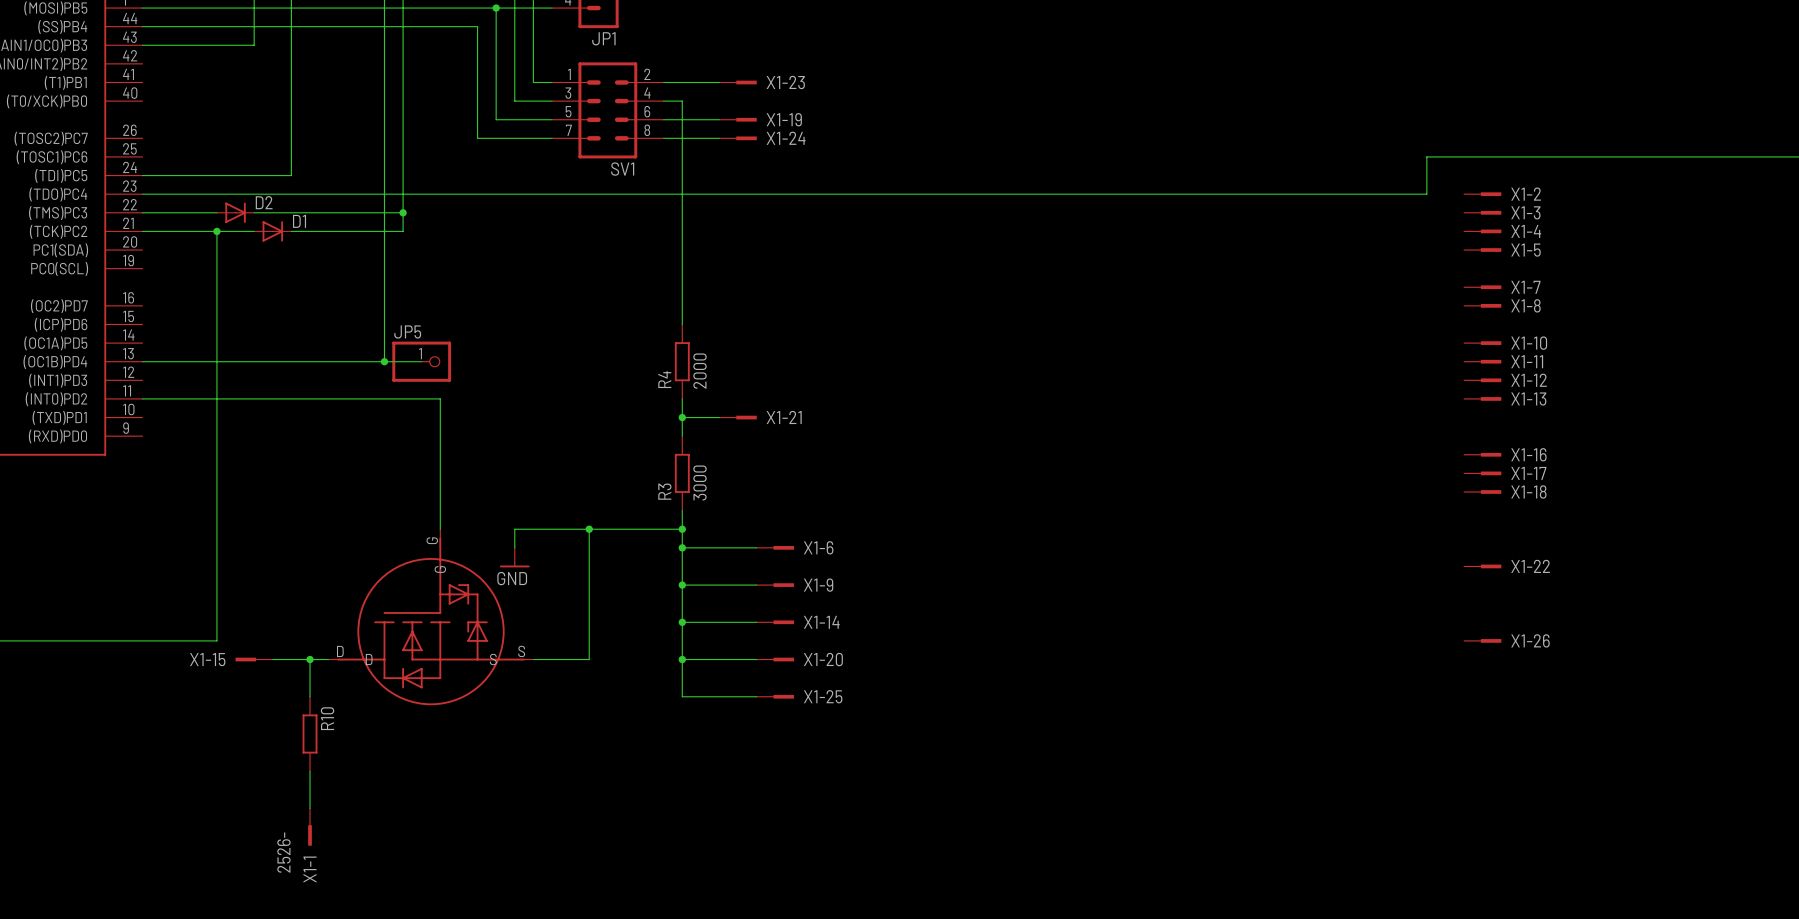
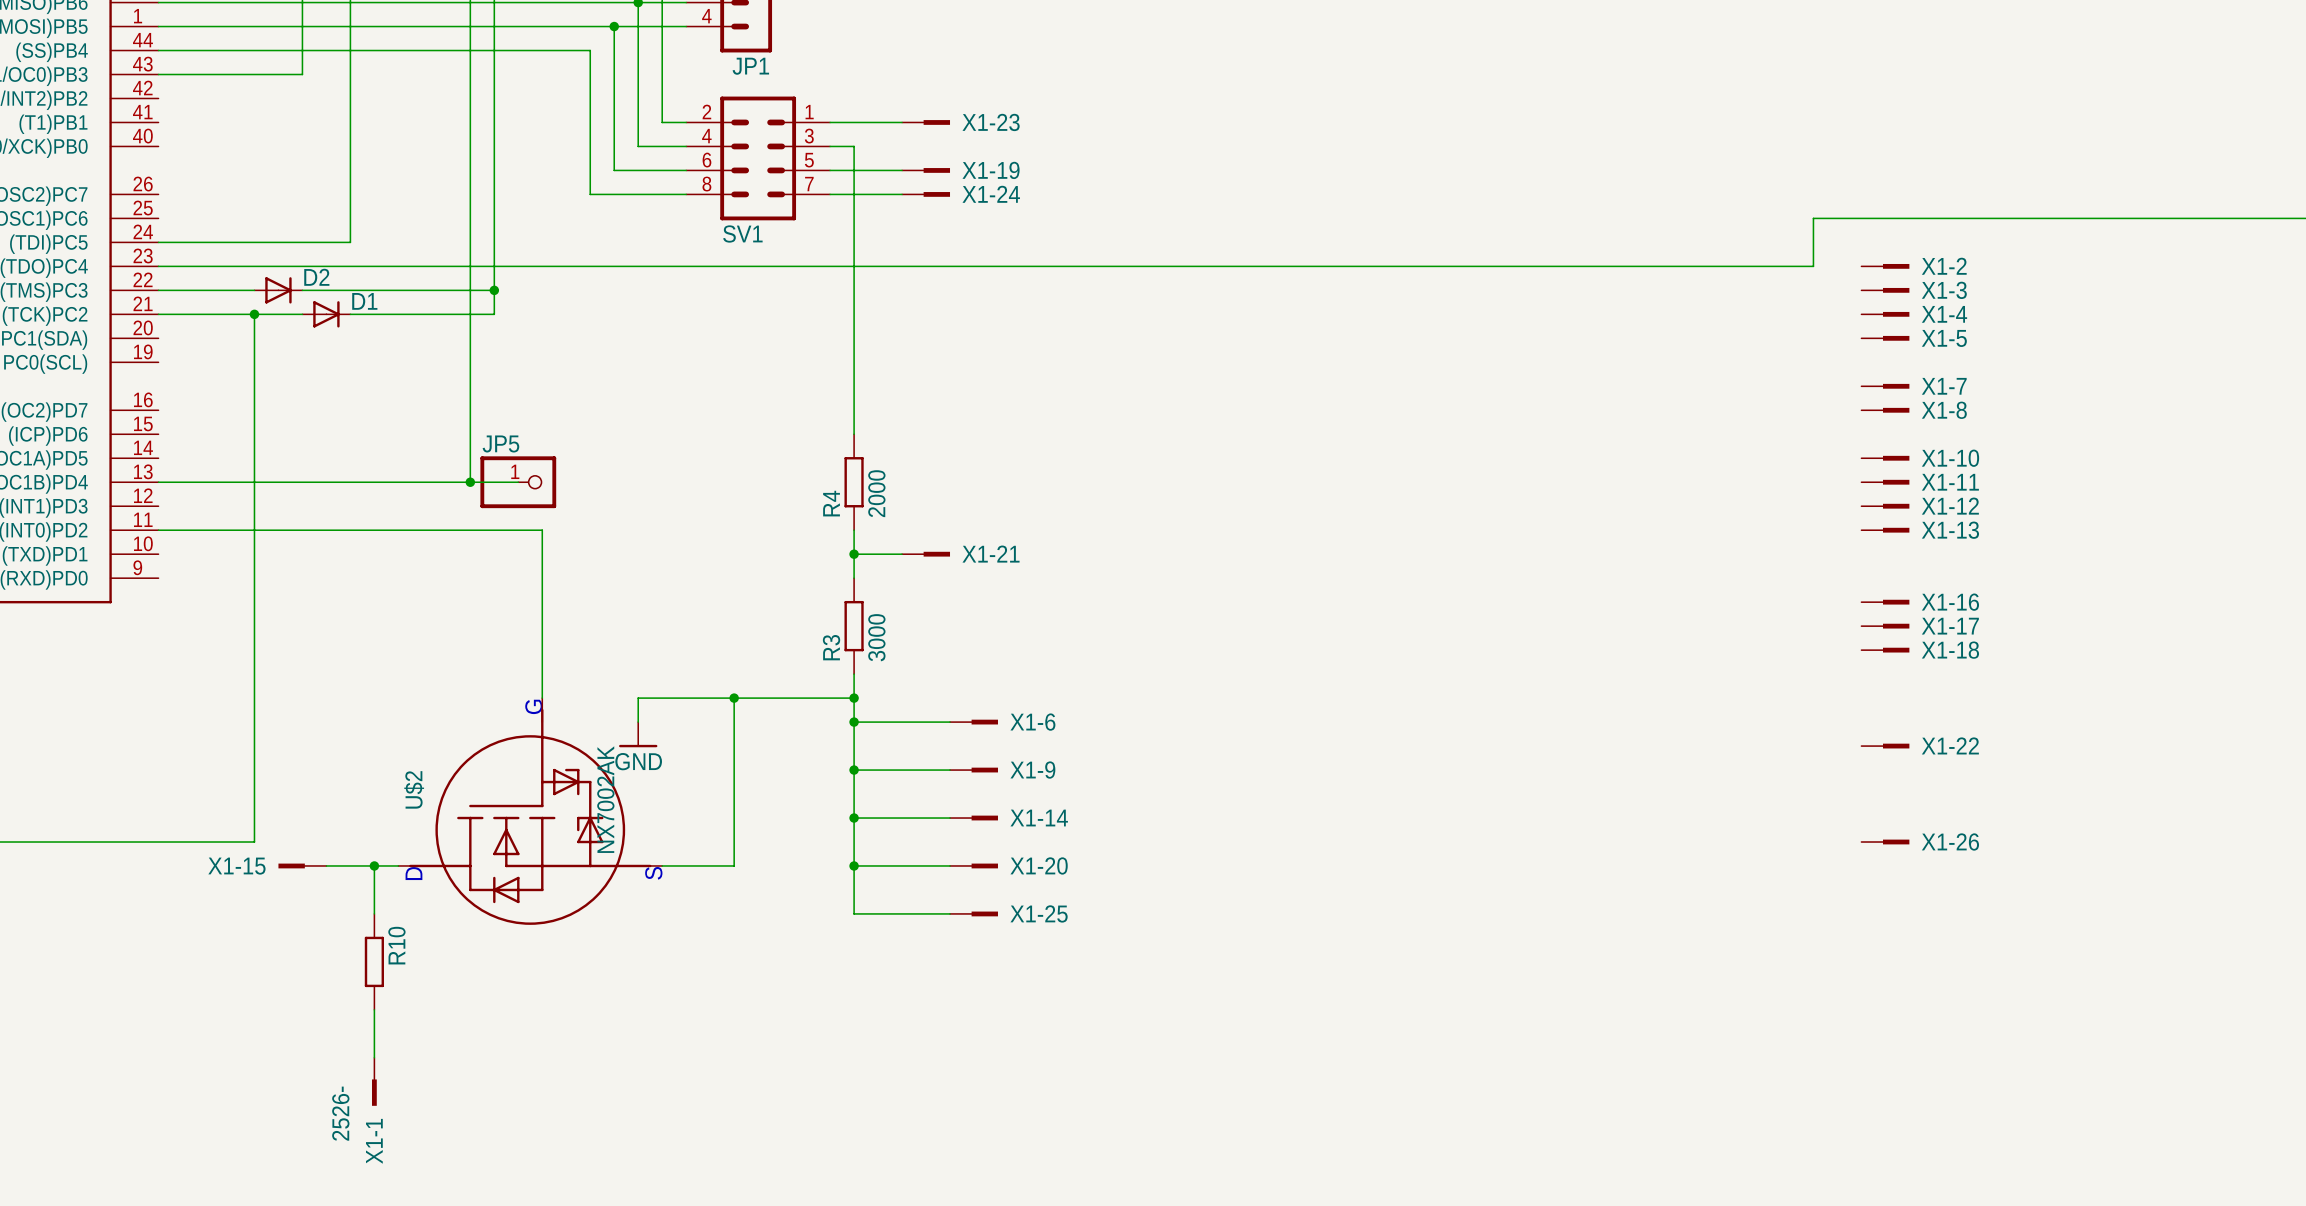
SV1 flip: as is (607, 110) -> left-right (758, 158)
U$2 symbol: [328, 529, 534, 706] -> [398, 698, 663, 925]
U$2 name: none -> U$2 (414, 789)
U$2 value: none -> NX7002AK (605, 799)

